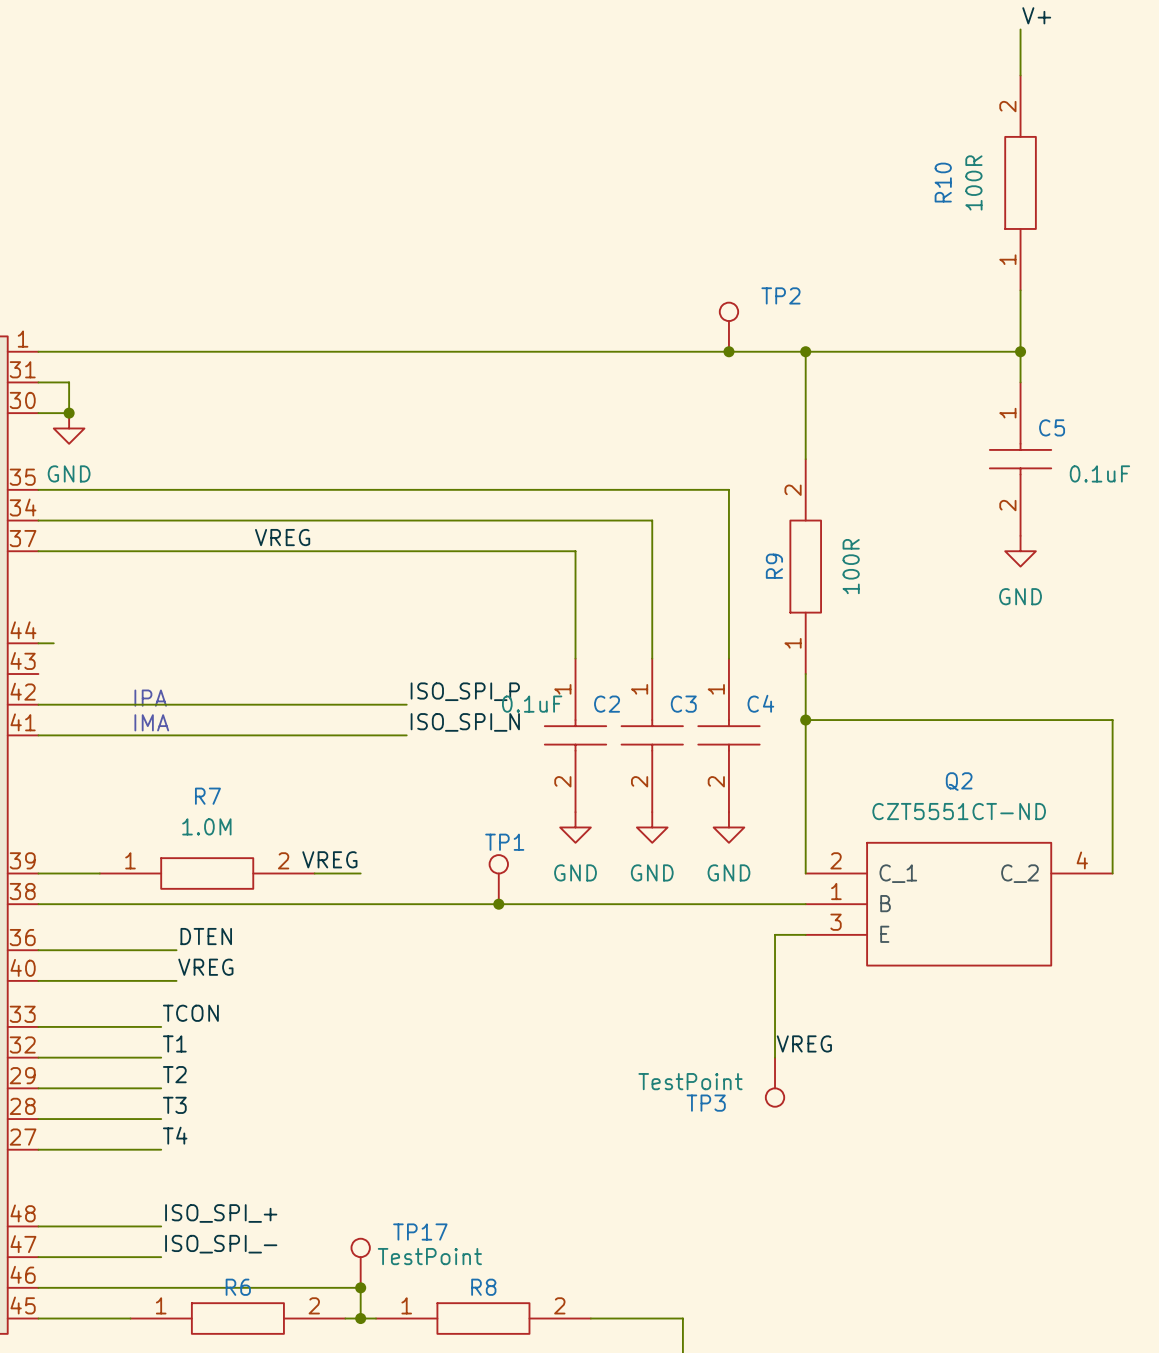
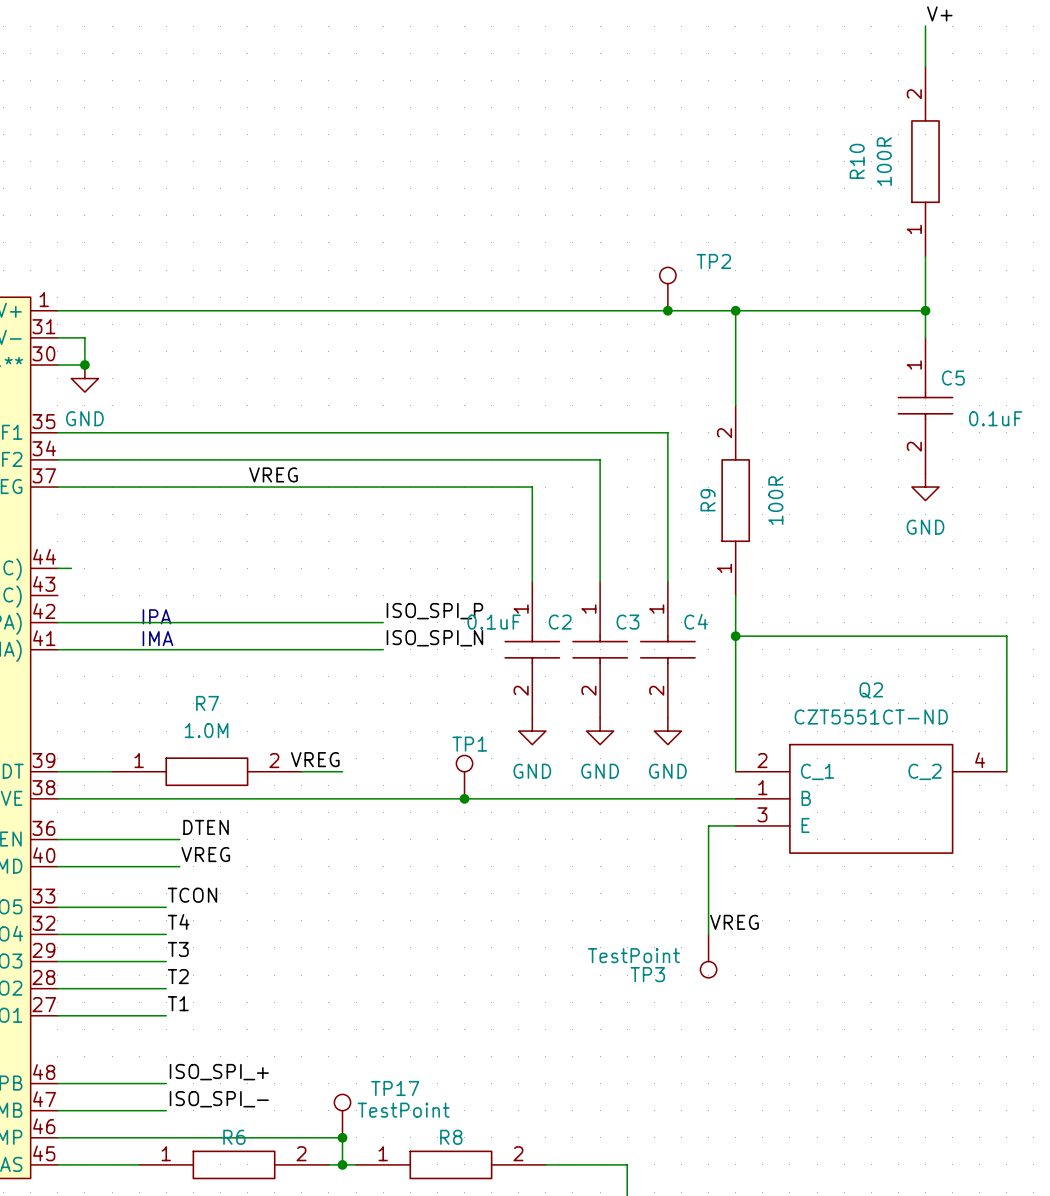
label: T1 (174, 1043) -> T4 (178, 922)
label: T2 (174, 1074) -> T3 (178, 949)
label: T3 (174, 1105) -> T2 (178, 976)
label: T4 (175, 1135) -> T1 (178, 1003)

